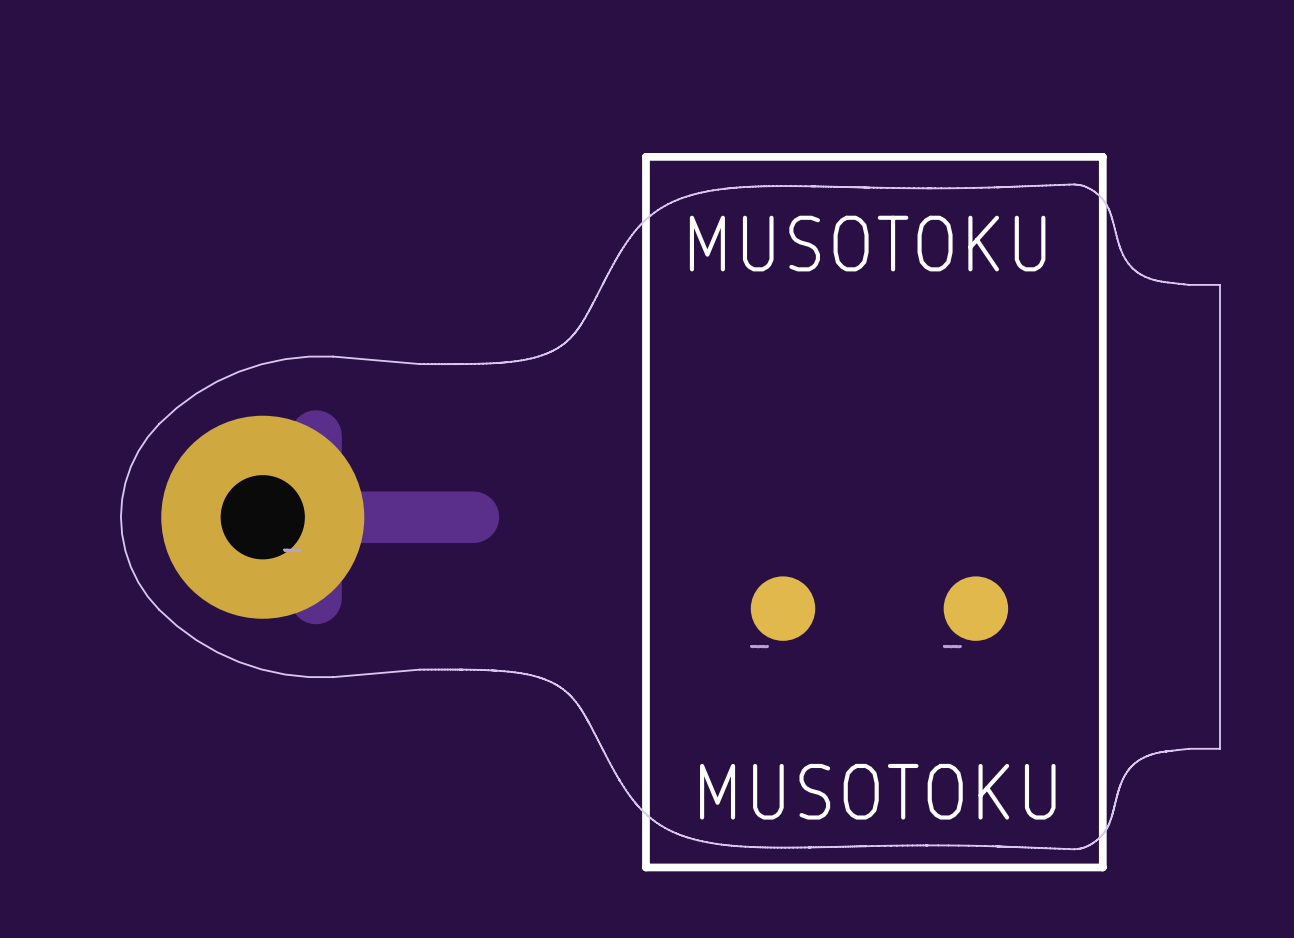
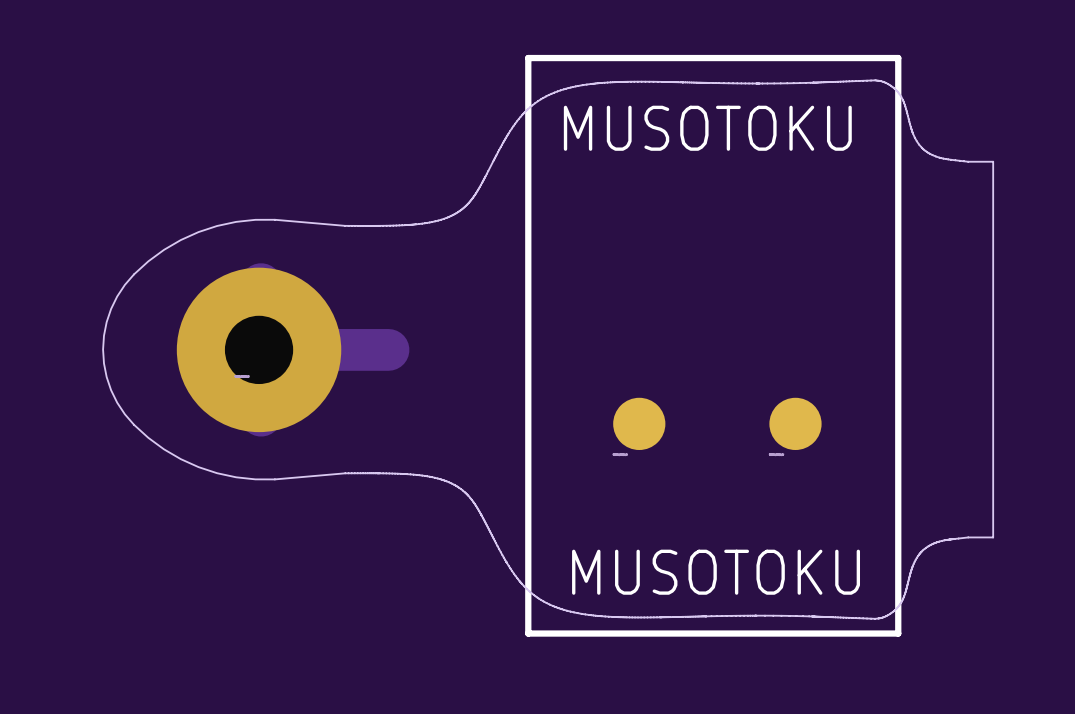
via position: (262, 517) -> (259, 349)

